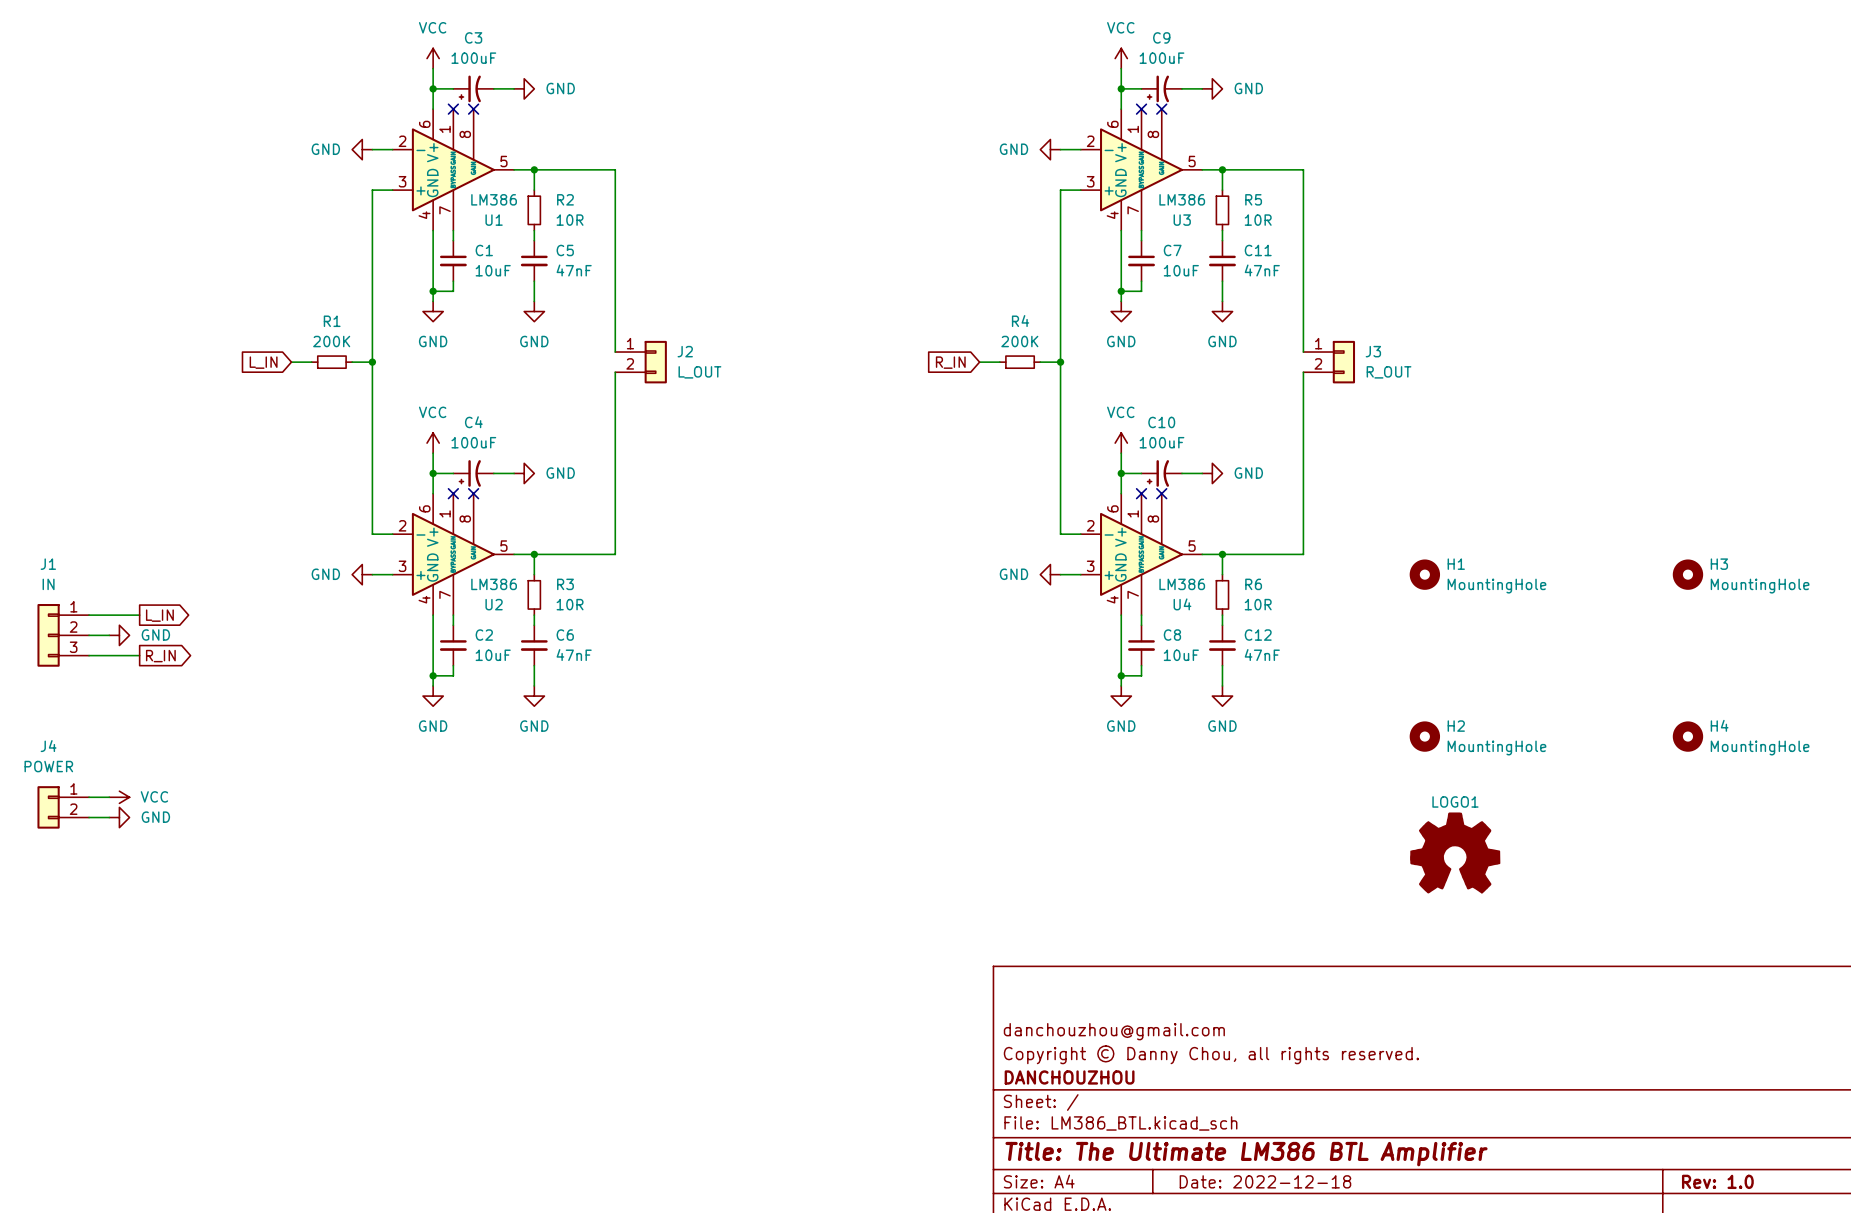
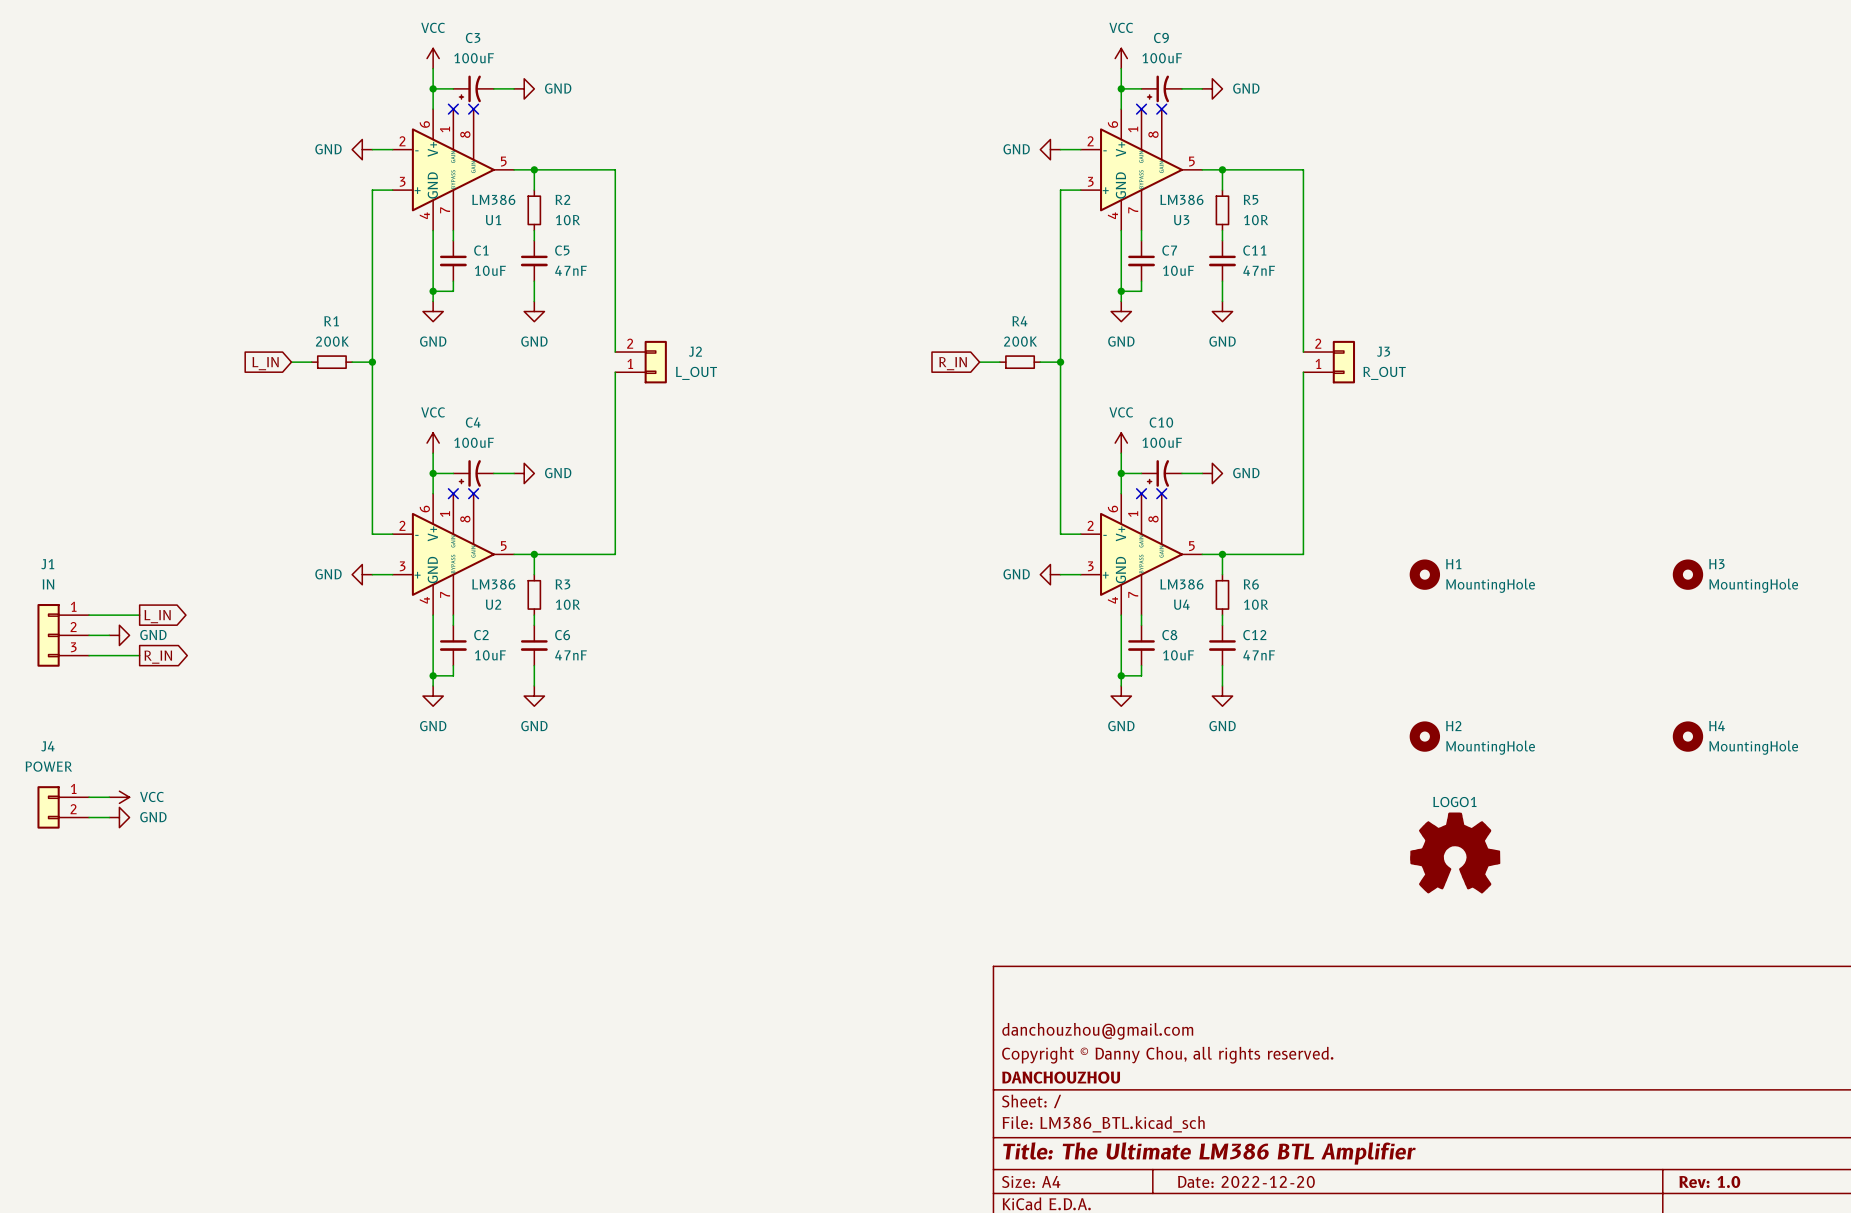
J2 flip: as is (655, 362) -> up-down (655, 362)
J3 flip: as is (1343, 362) -> up-down (1343, 362)
title block: Date: 2022-12-18 (1265, 1181) -> Date: 2022-12-20 (1246, 1181)

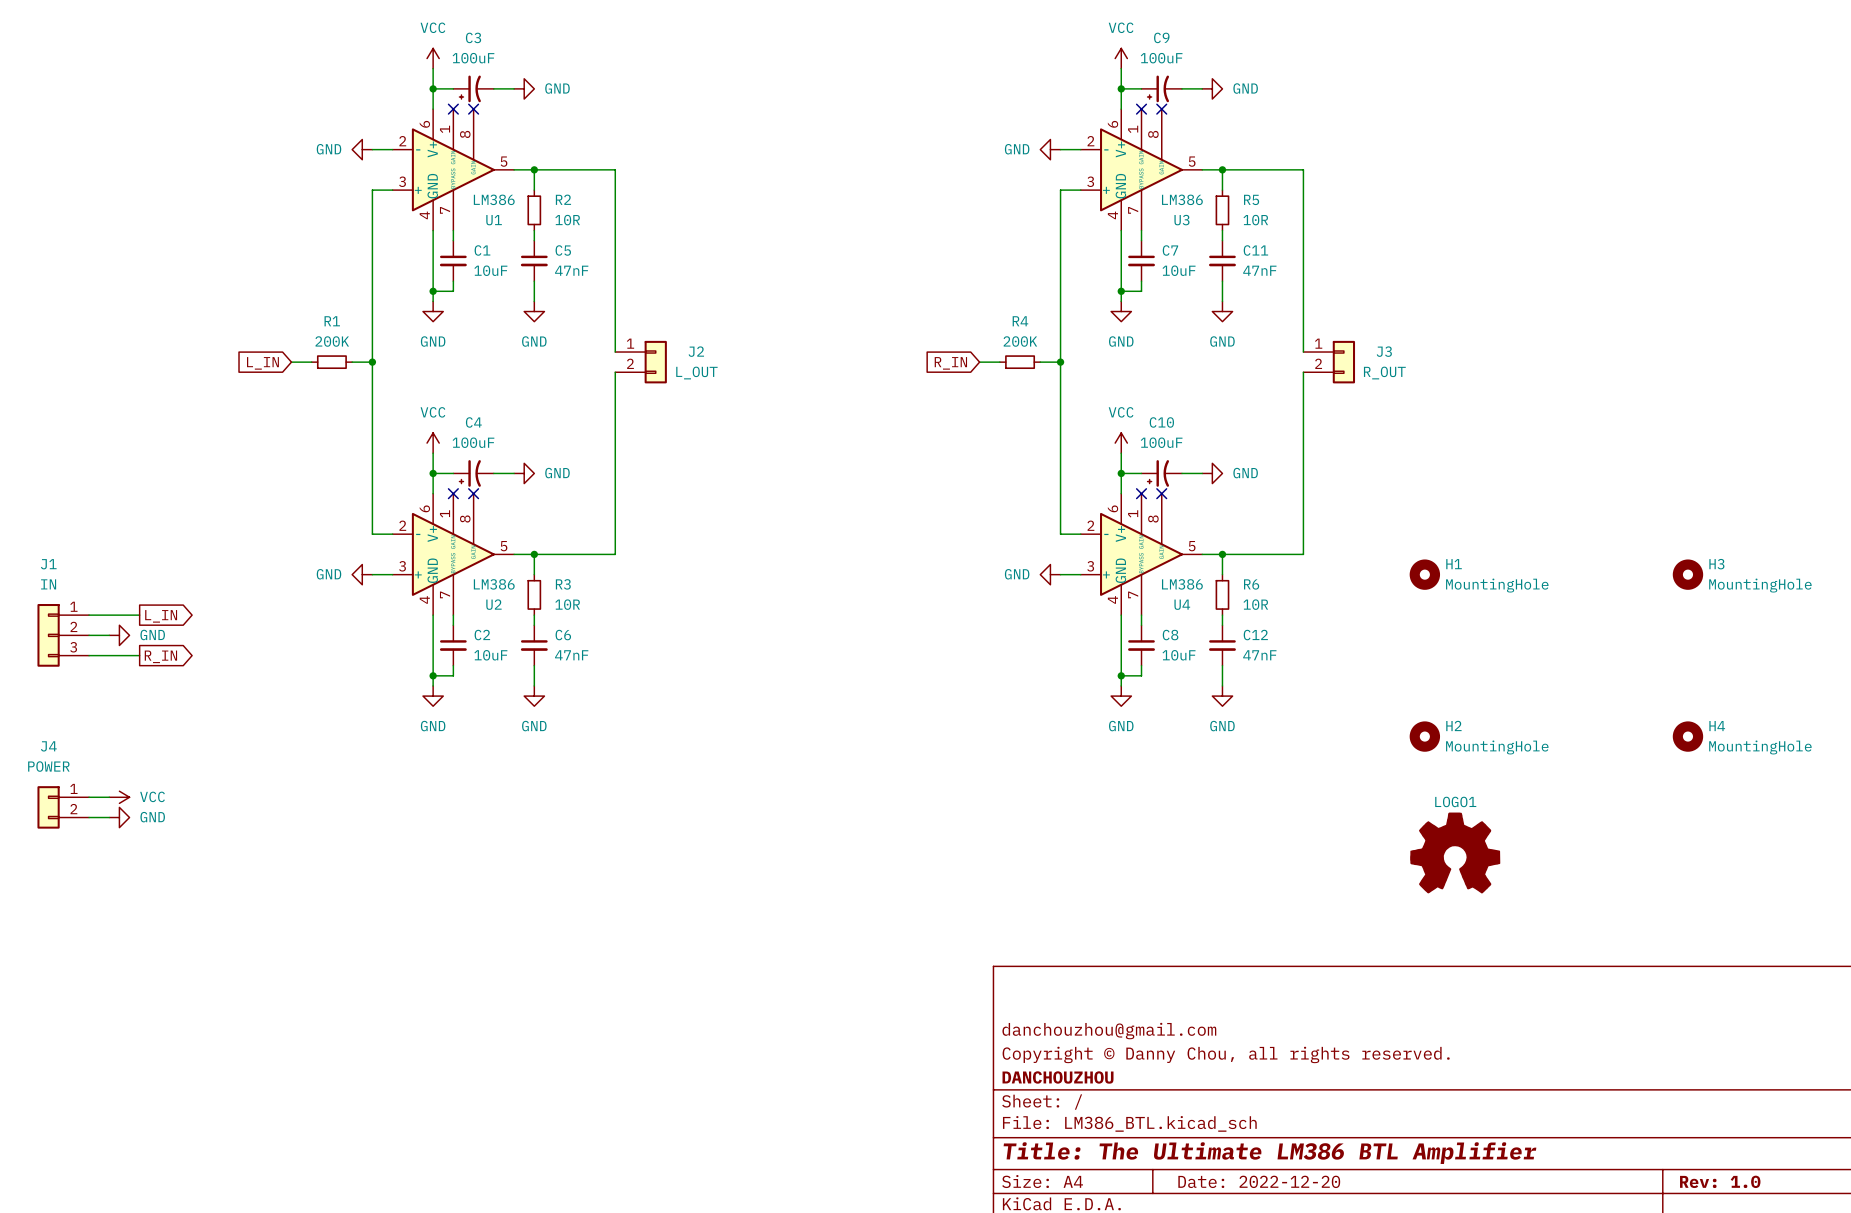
J2 flip: as is (655, 362) -> up-down (655, 362)
J3 flip: as is (1343, 362) -> up-down (1343, 362)

